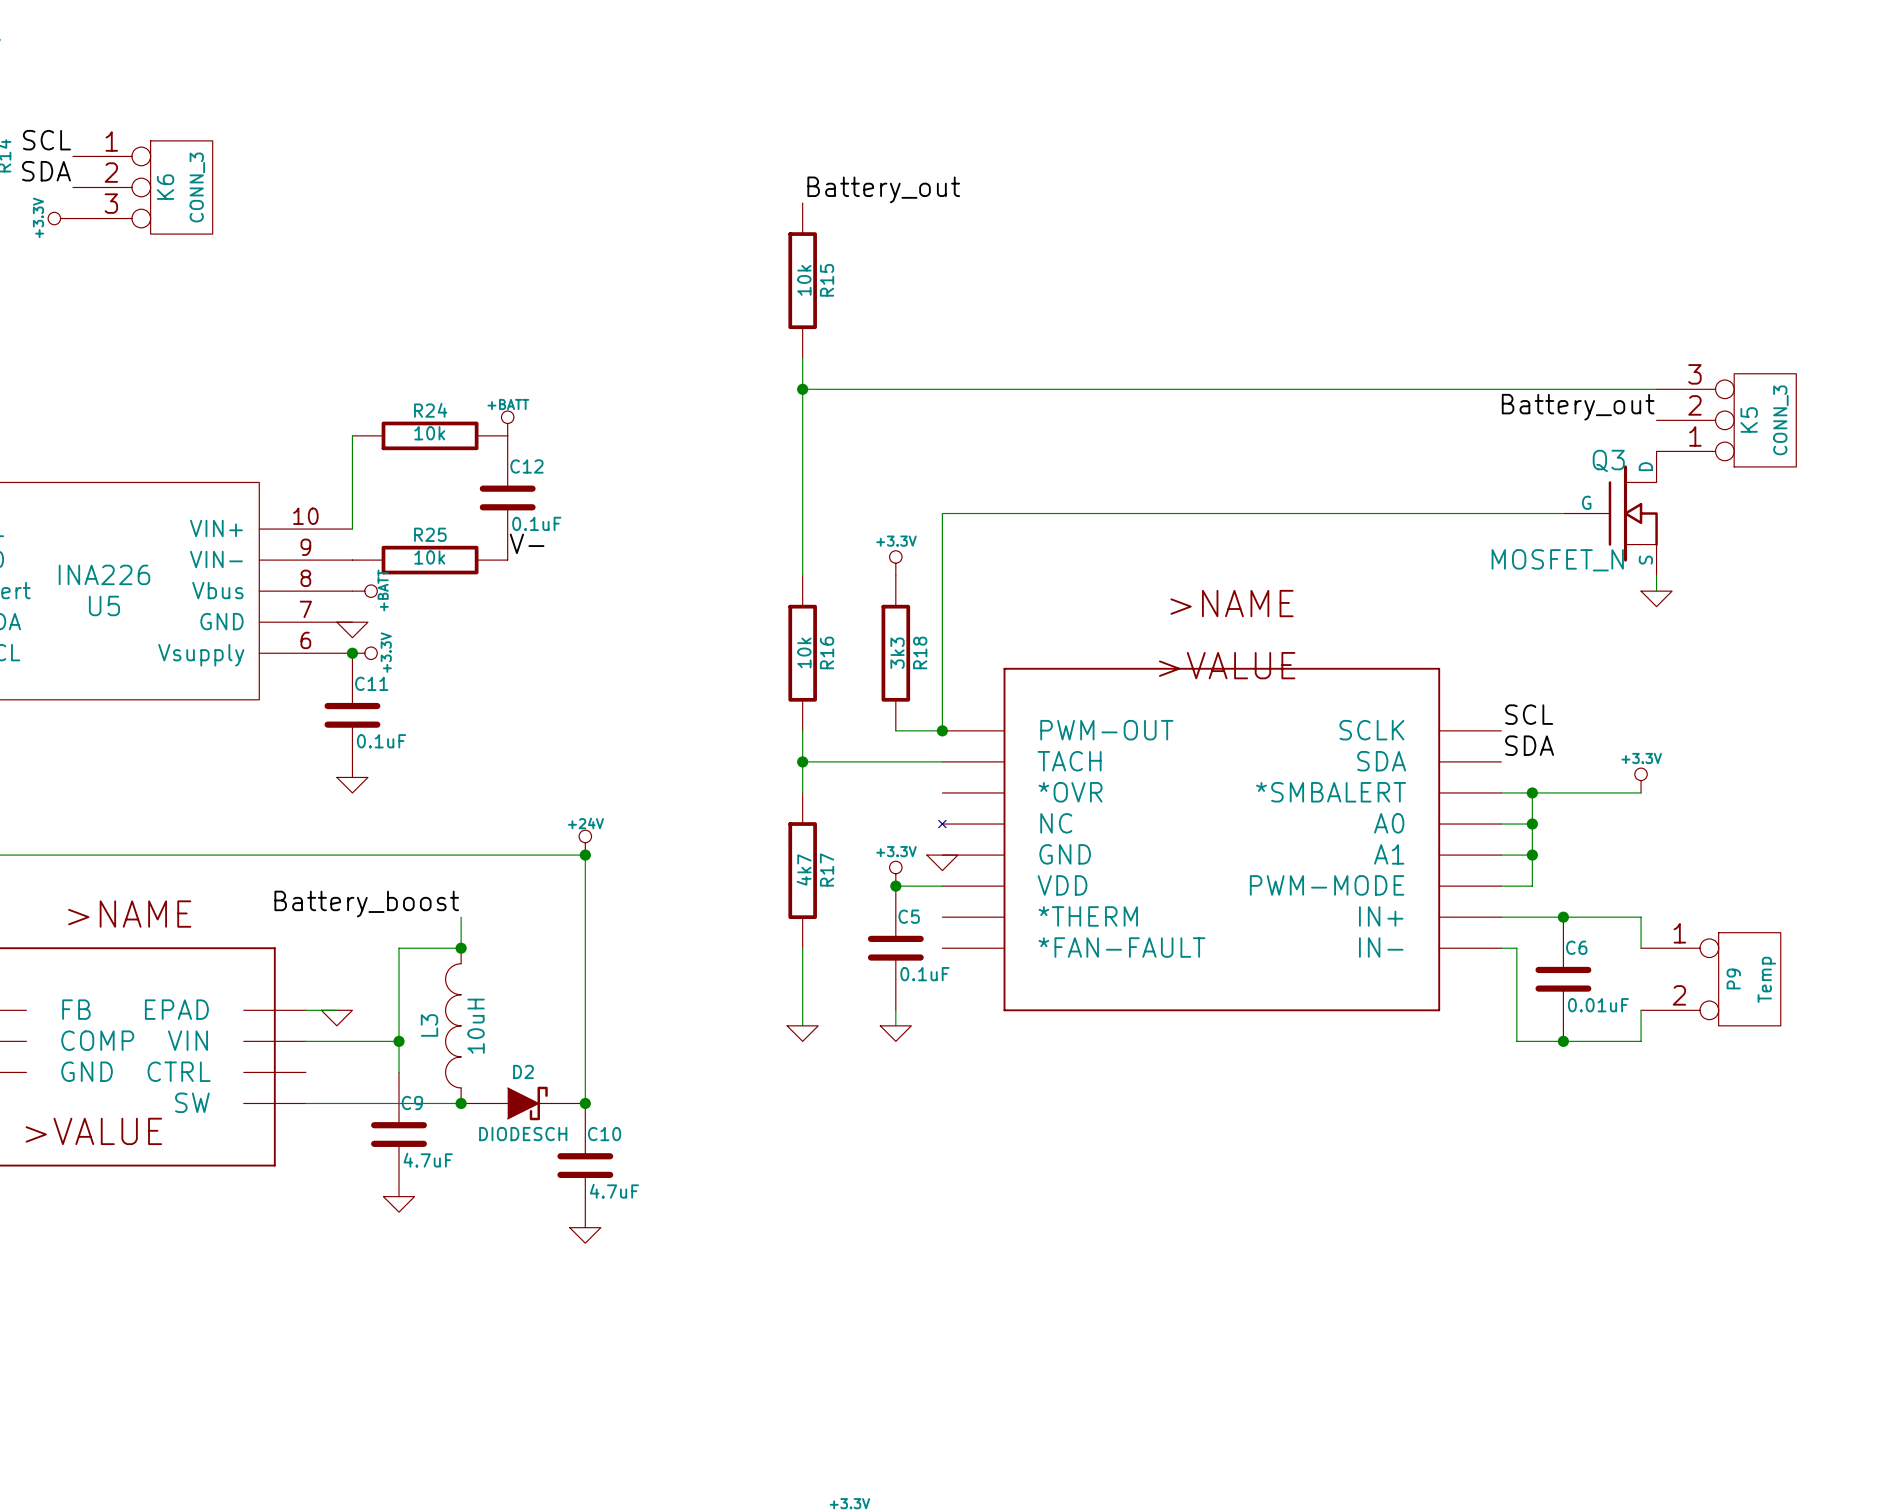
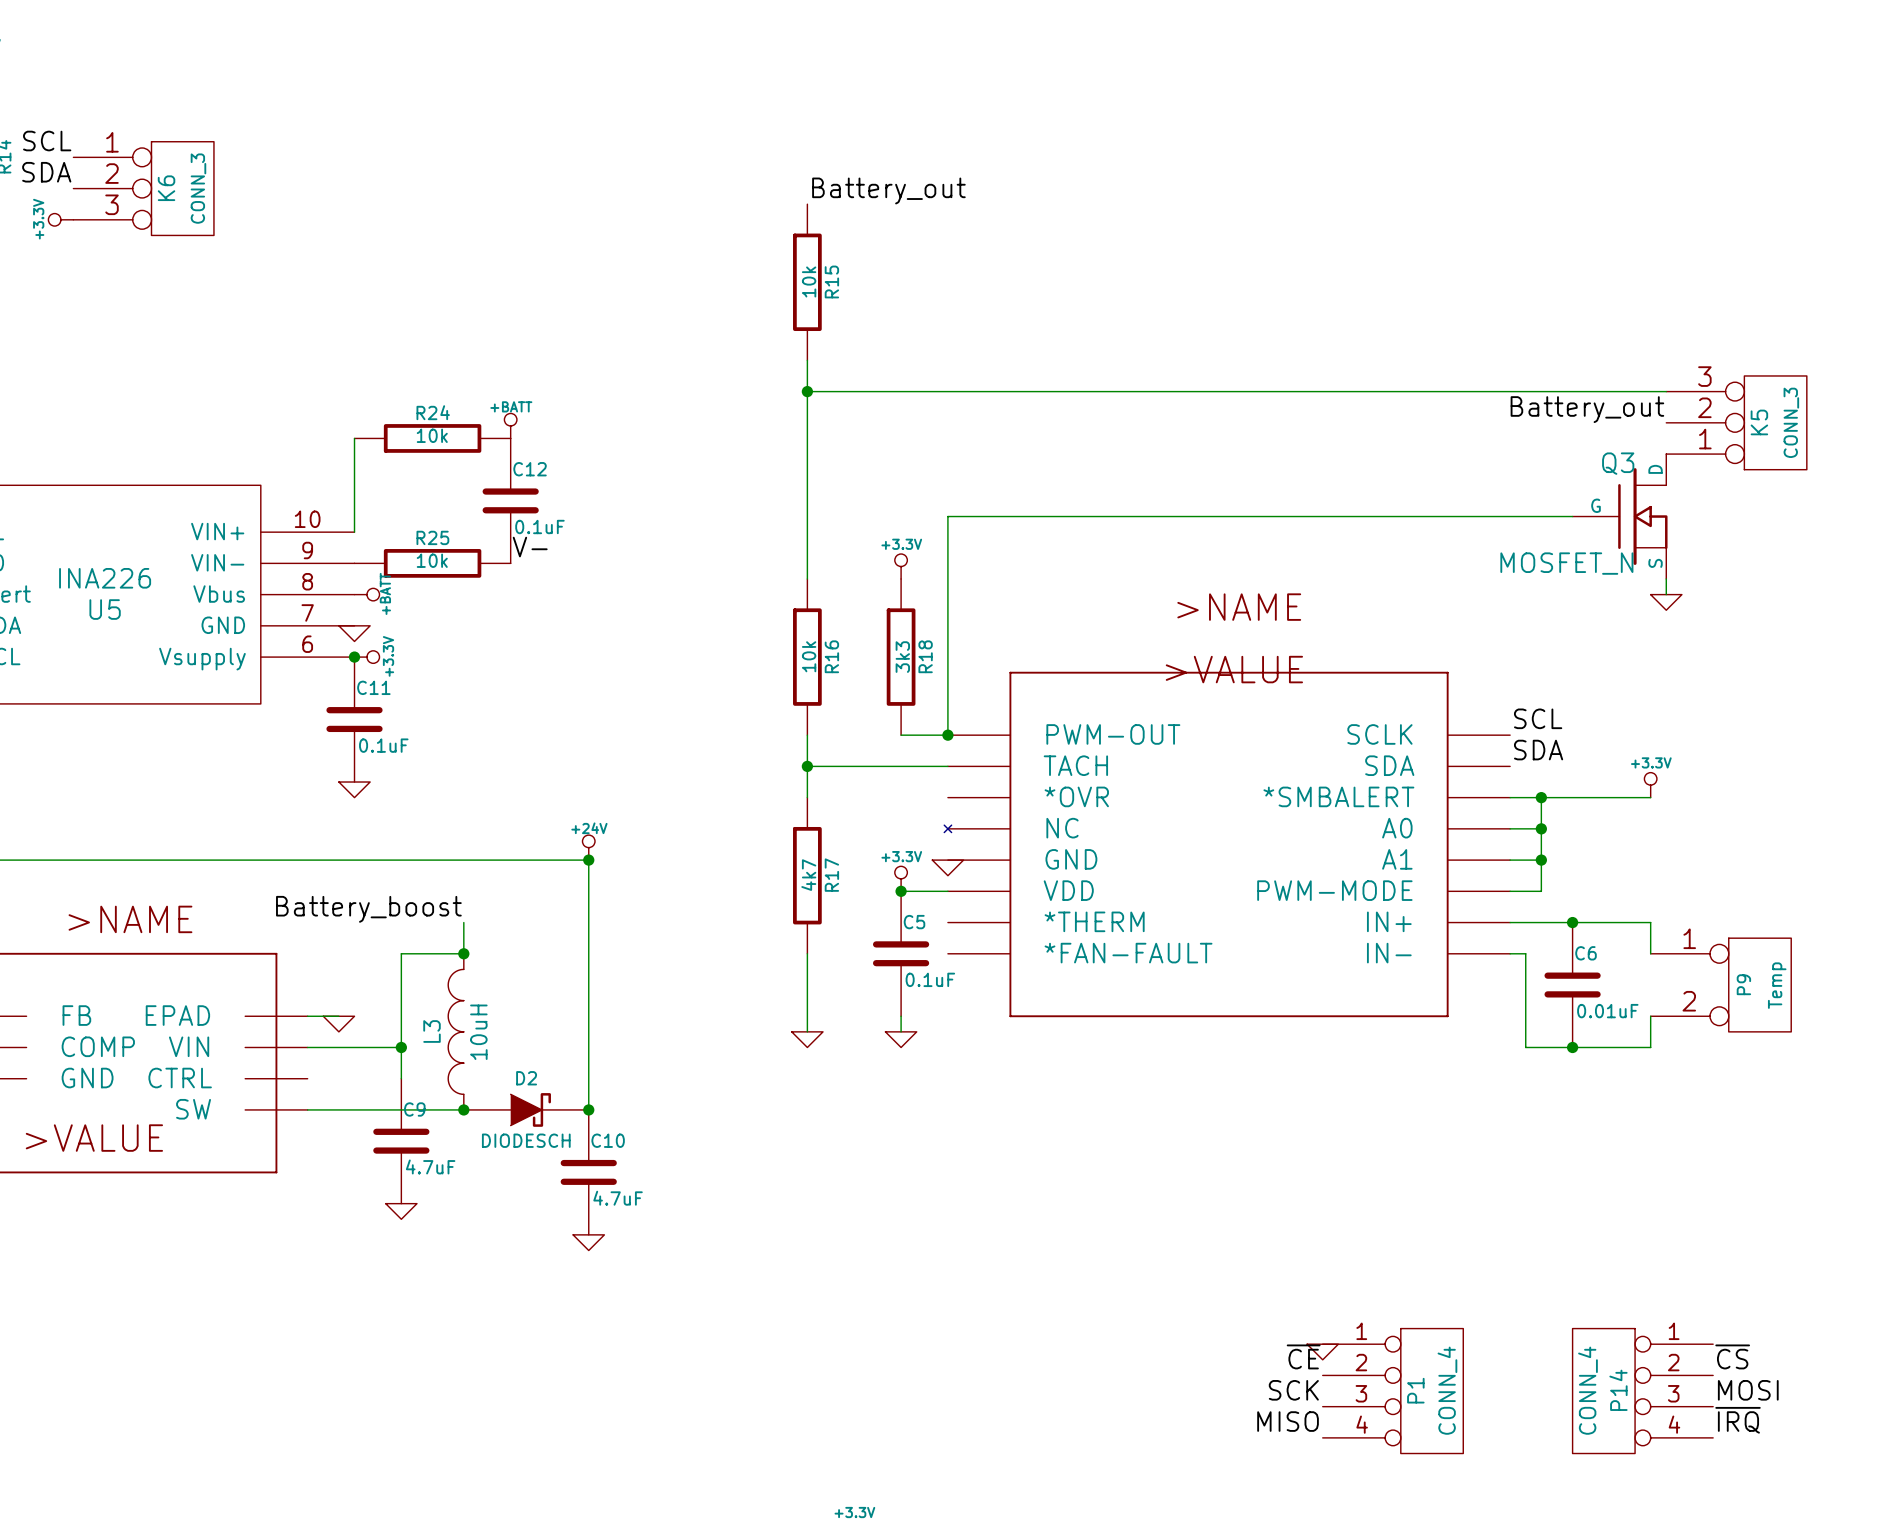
power symbol: none -> (1322, 1352)
label: none -> ~{CE} (1303, 1356)
label: none -> ~{CS} (1732, 1356)
label: none -> SCK (1293, 1390)
P1: none -> CONN_4 (1393, 1391)
P14: none -> CONN_4 (1642, 1391)
label: none -> MOSI (1748, 1390)
label: none -> ~{IRQ} (1738, 1420)
label: none -> MISO (1288, 1421)

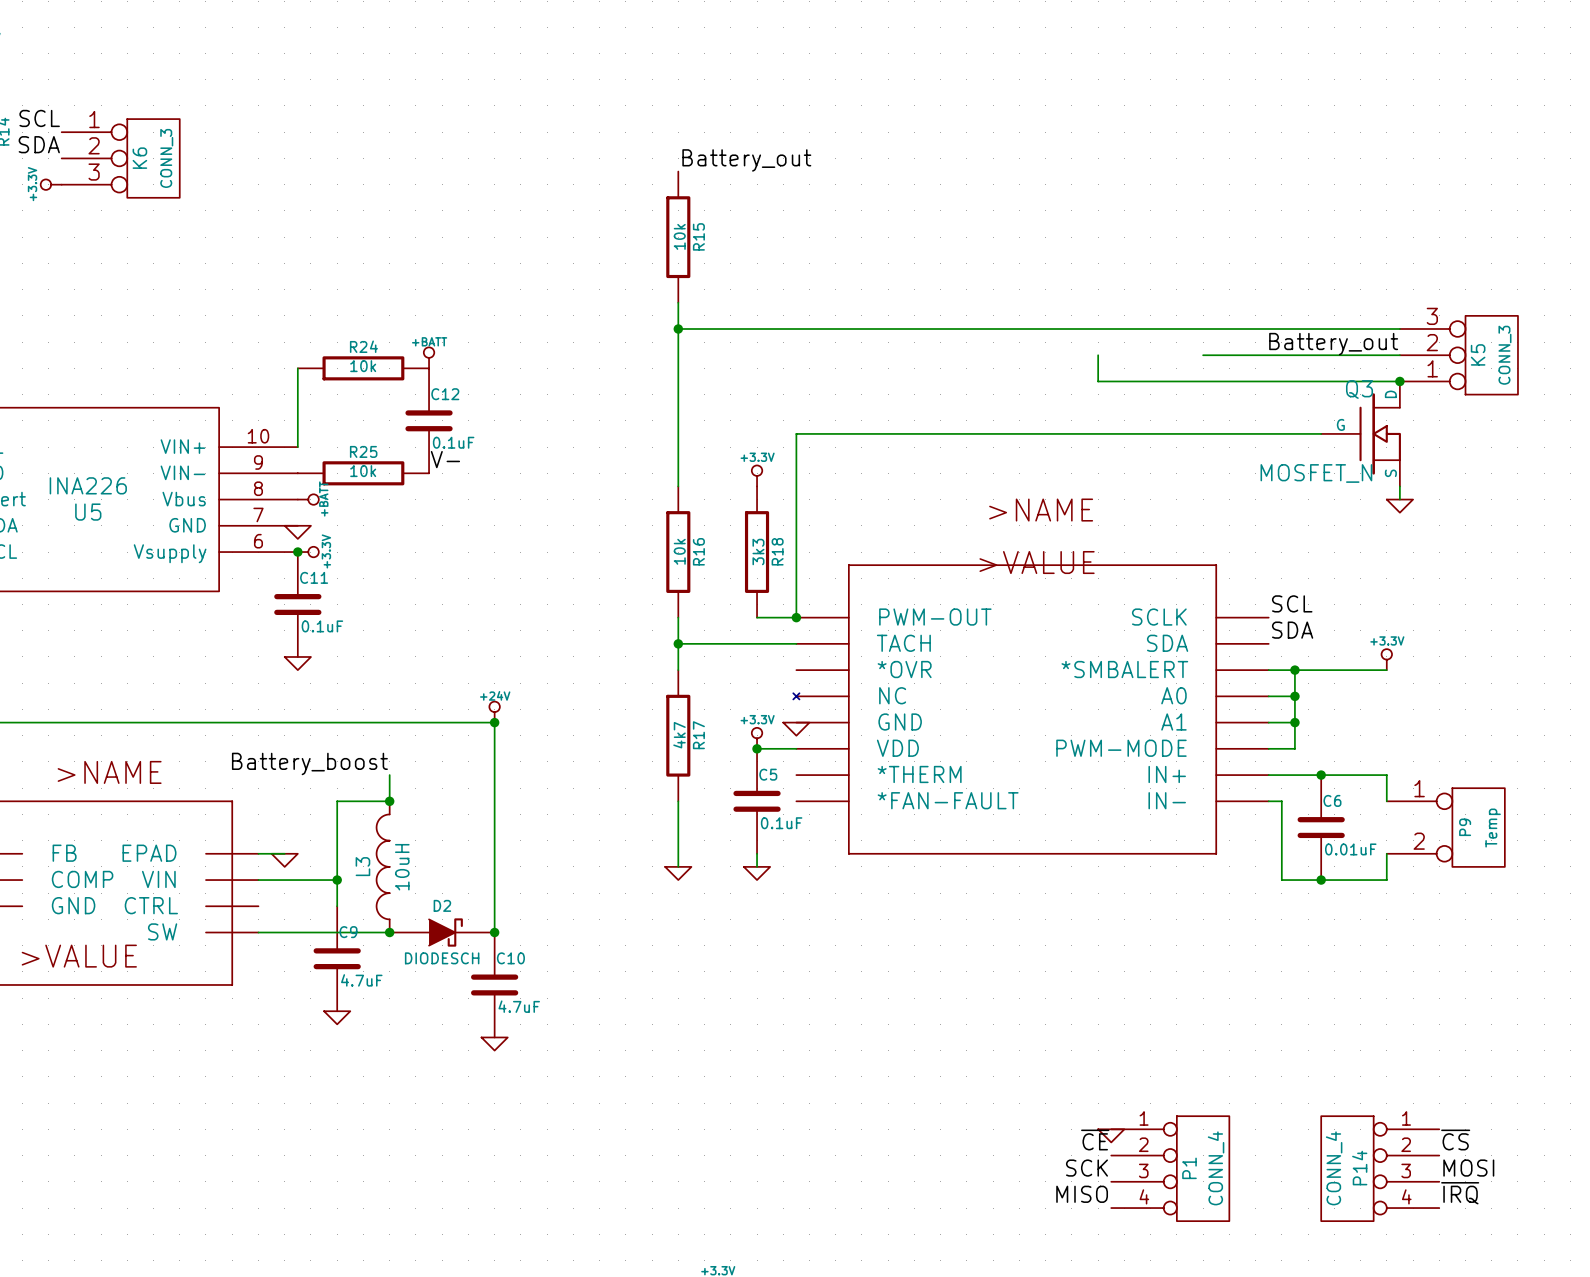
wire: none -> (1098, 355) (1098, 381) (1399, 381)
wire: none -> (1203, 355) (1399, 355)
junction: none -> (1399, 381)

